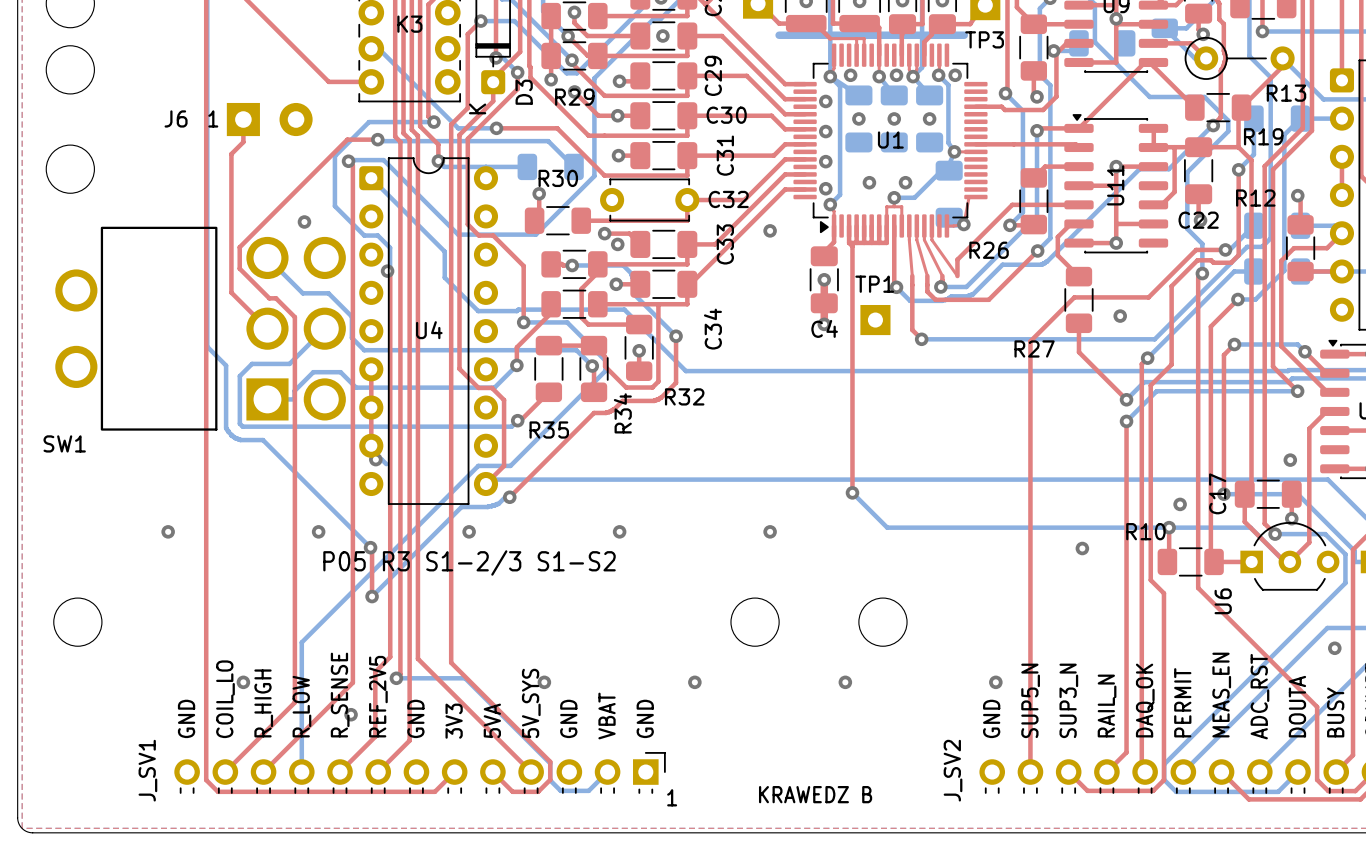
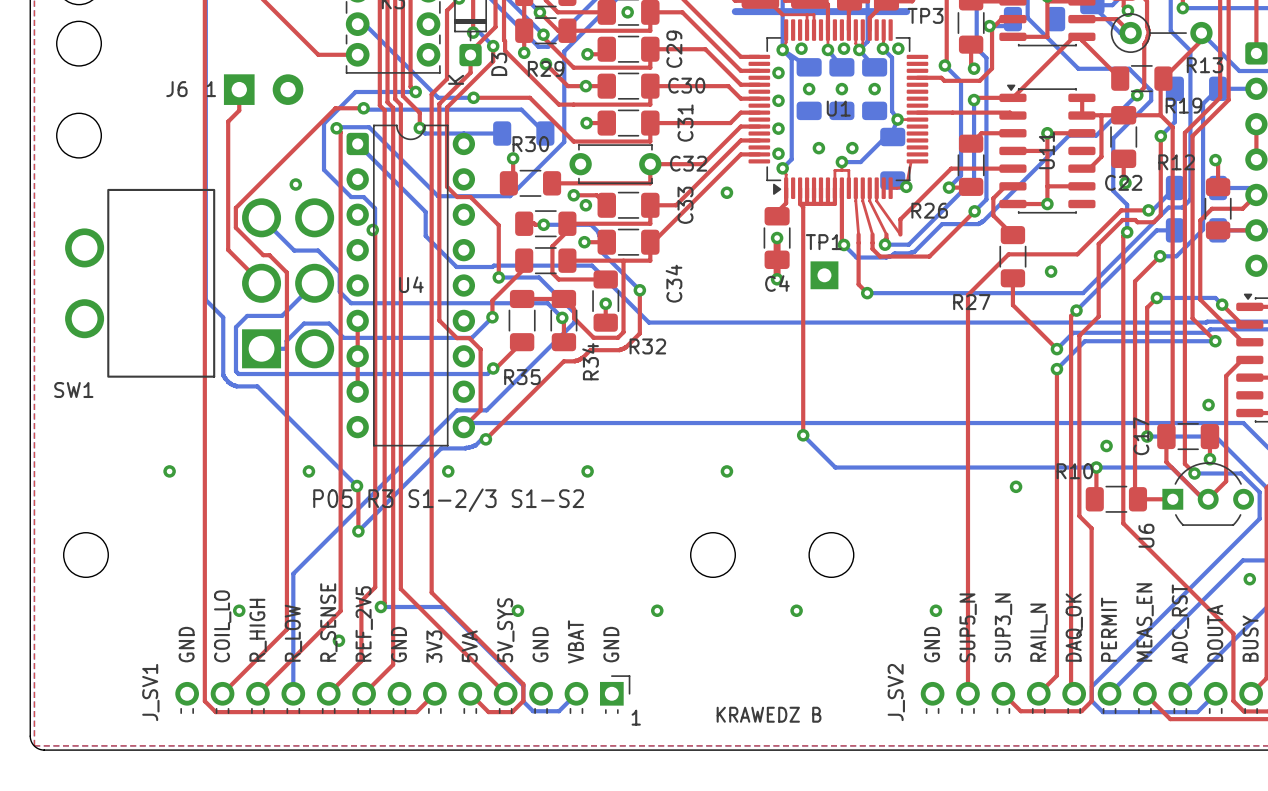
bottom track: (375, 459) (381, 459) (386, 464) -> none
via: (375, 459) -> none

